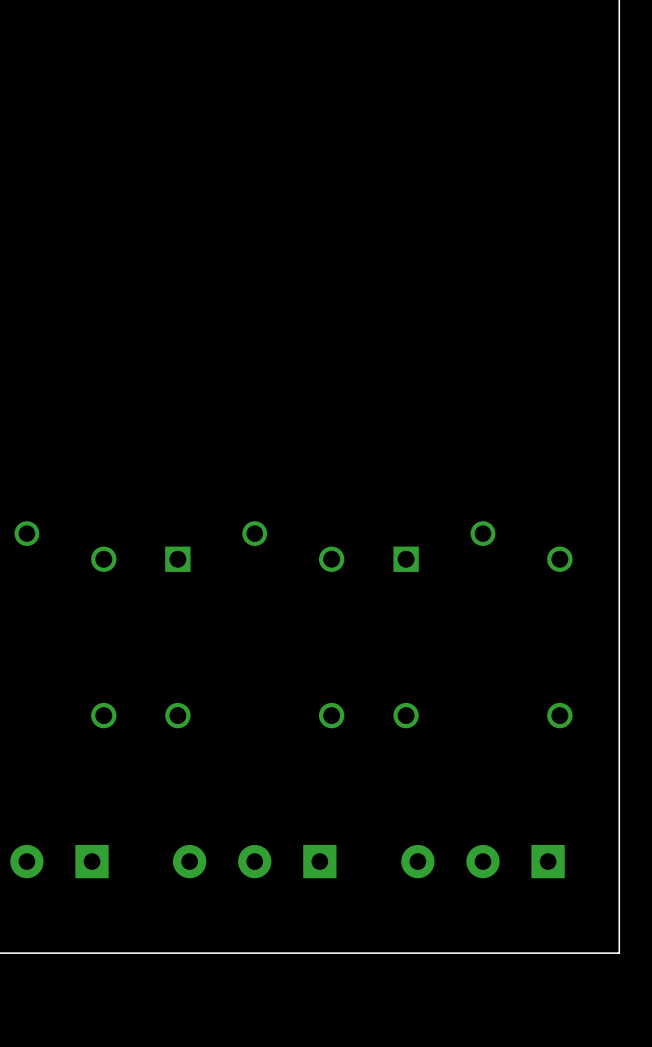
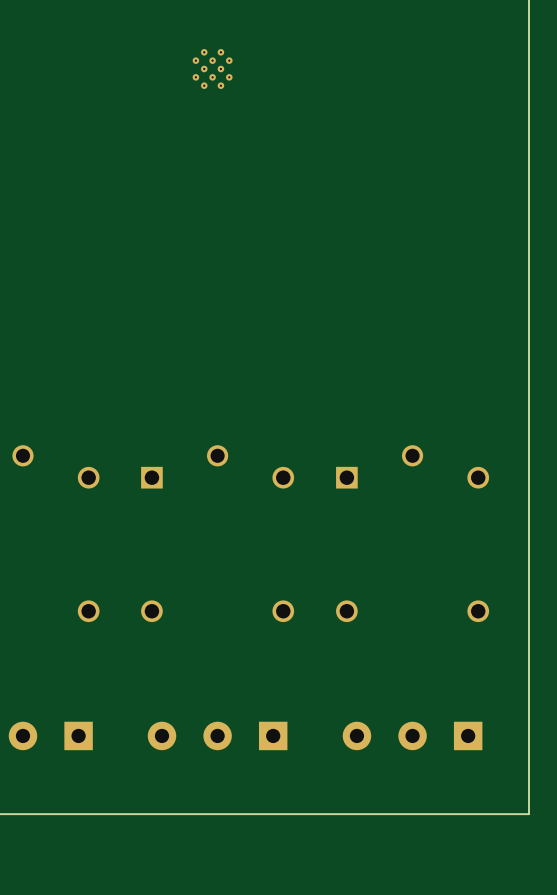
part: none -> (212, 68)

